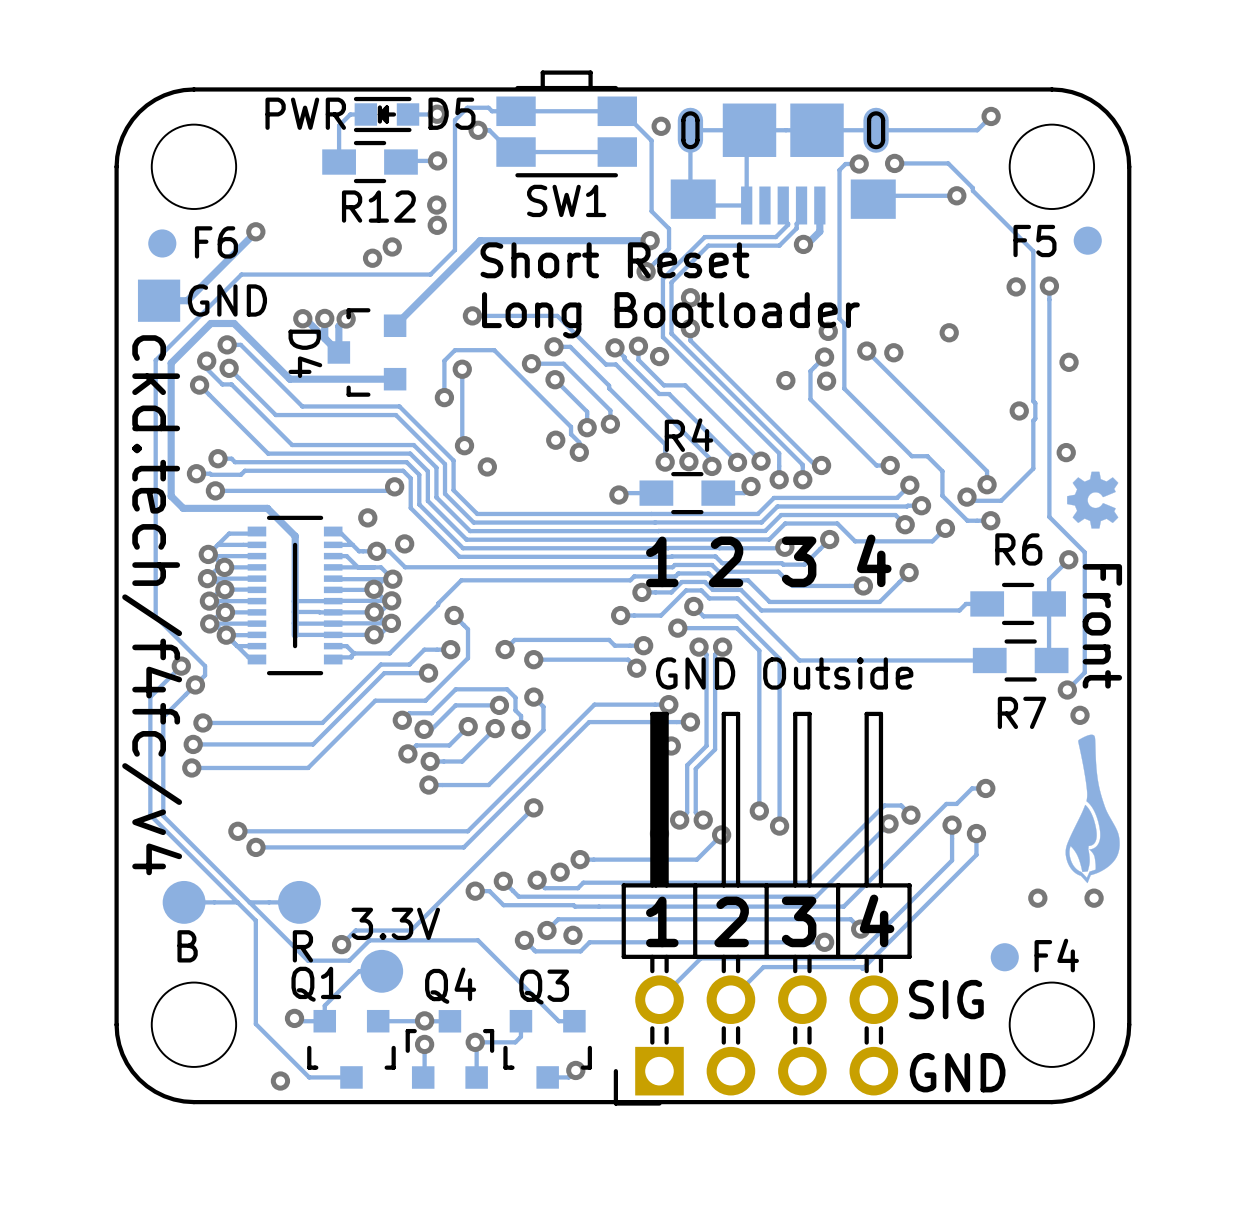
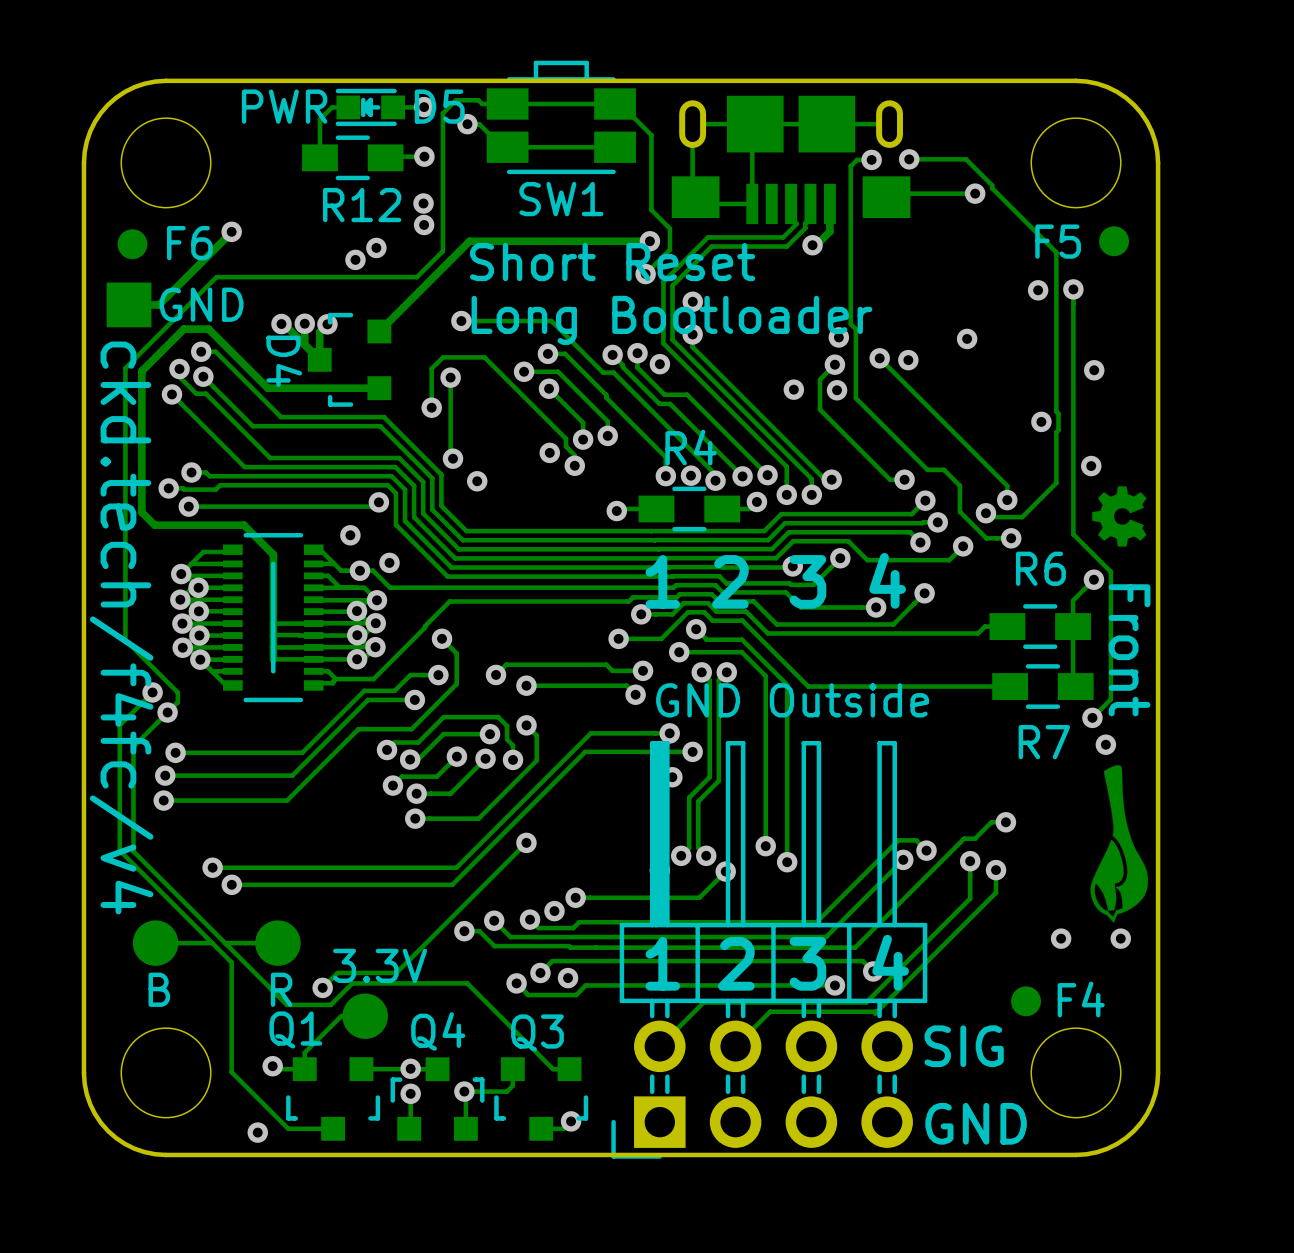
part footprint: [670, 103, 896, 225] -> [671, 95, 911, 225]
track: (991, 116) (977, 130) (876, 130) -> none
via: (991, 116) -> none
board edge: (697, 120) (696, 142) (693, 146) (687, 146) (683, 141) (683, 117) (687, 113) (692, 113) (697, 120) -> none
board edge: (883, 120) (882, 142) (878, 146) (873, 146) (869, 141) (869, 117) (873, 113) (877, 113) (883, 120) -> none
via: (661, 126) -> none

